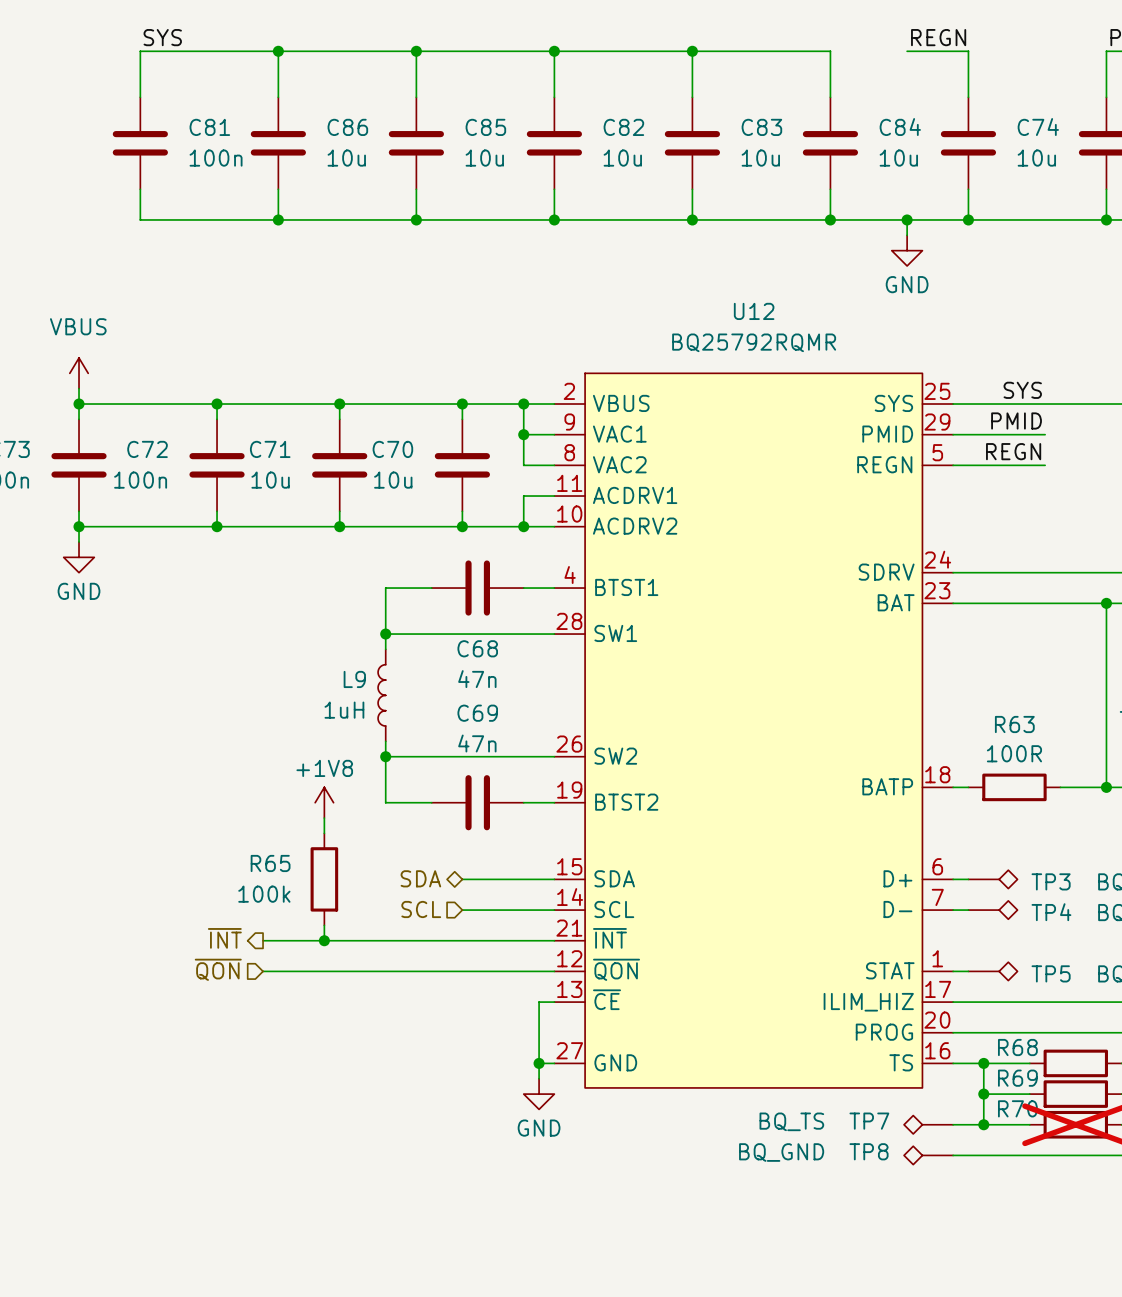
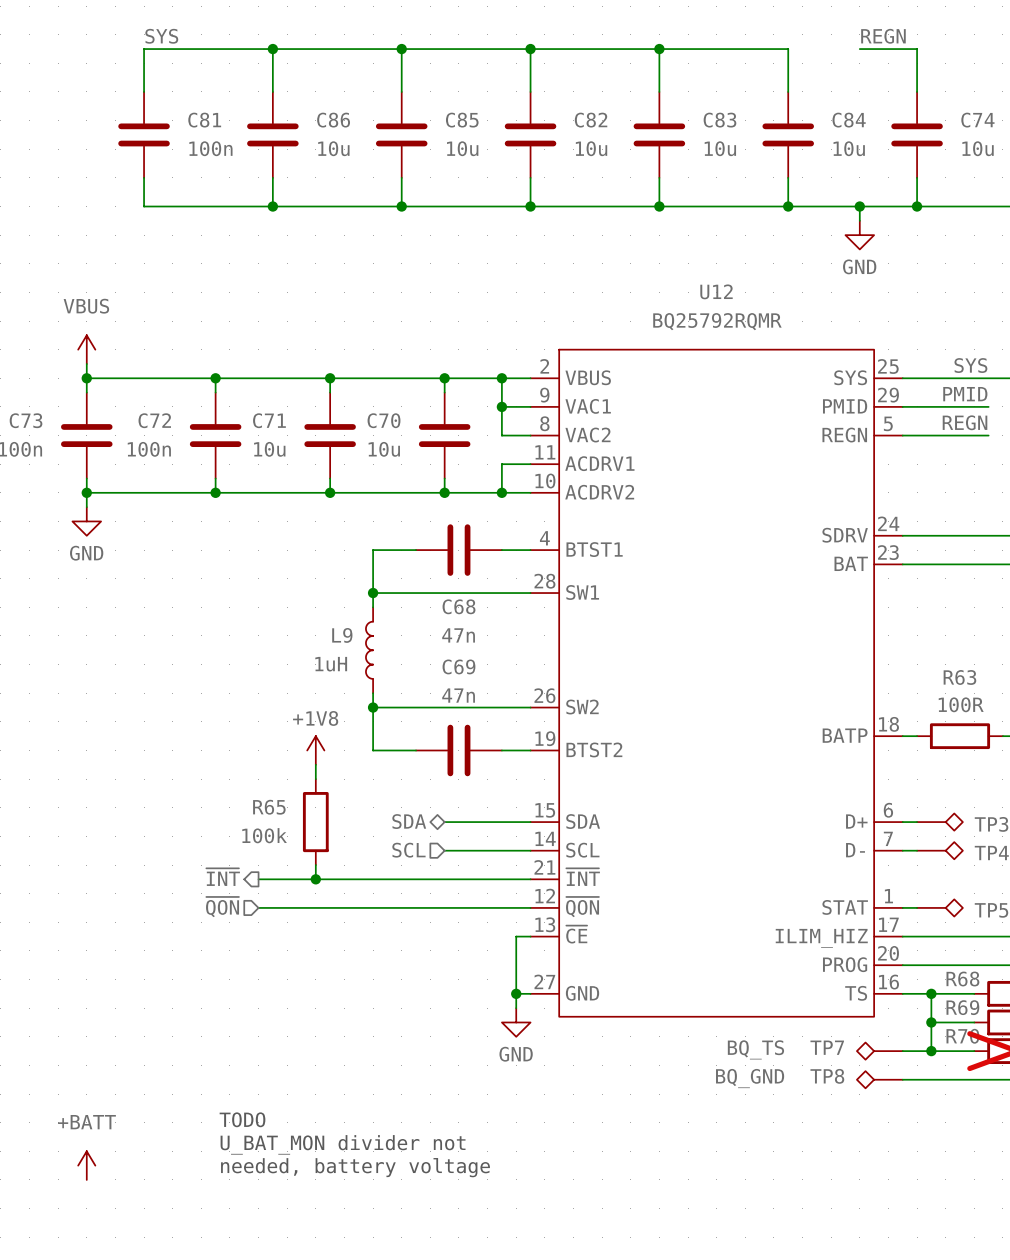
text: none -> TODO (242, 1119)
text: none -> U_BAT_MON divider not (343, 1144)
power symbol: none -> +BATT (86, 1165)
text: none -> needed, battery voltage (355, 1167)

